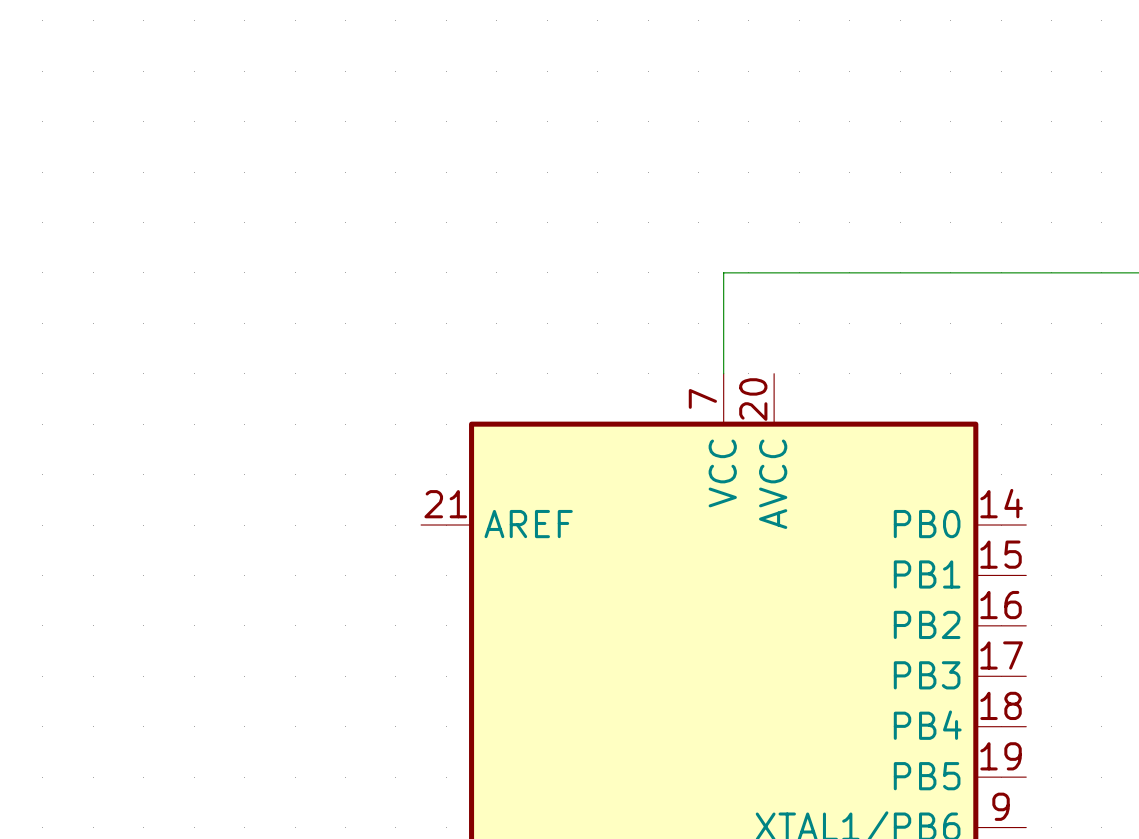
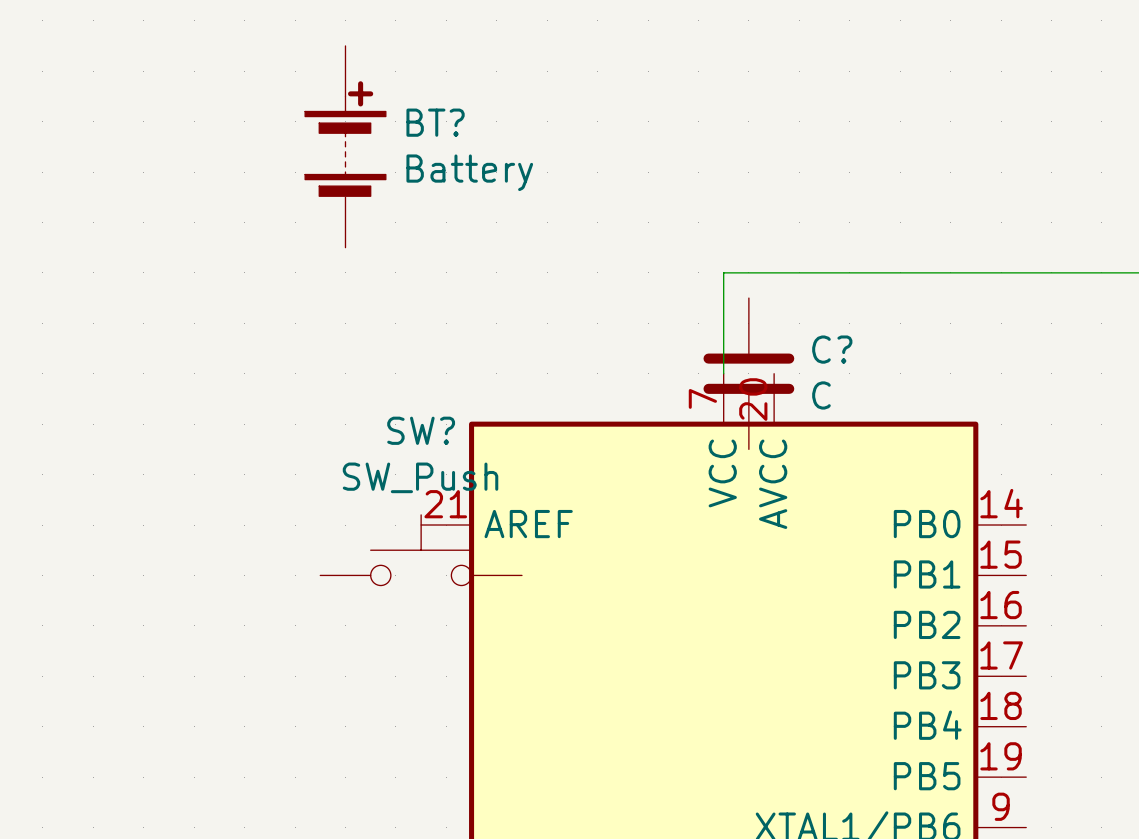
BT?: none -> Battery (345, 146)
C?: none -> C (748, 373)
SW?: none -> SW_Push (421, 550)

